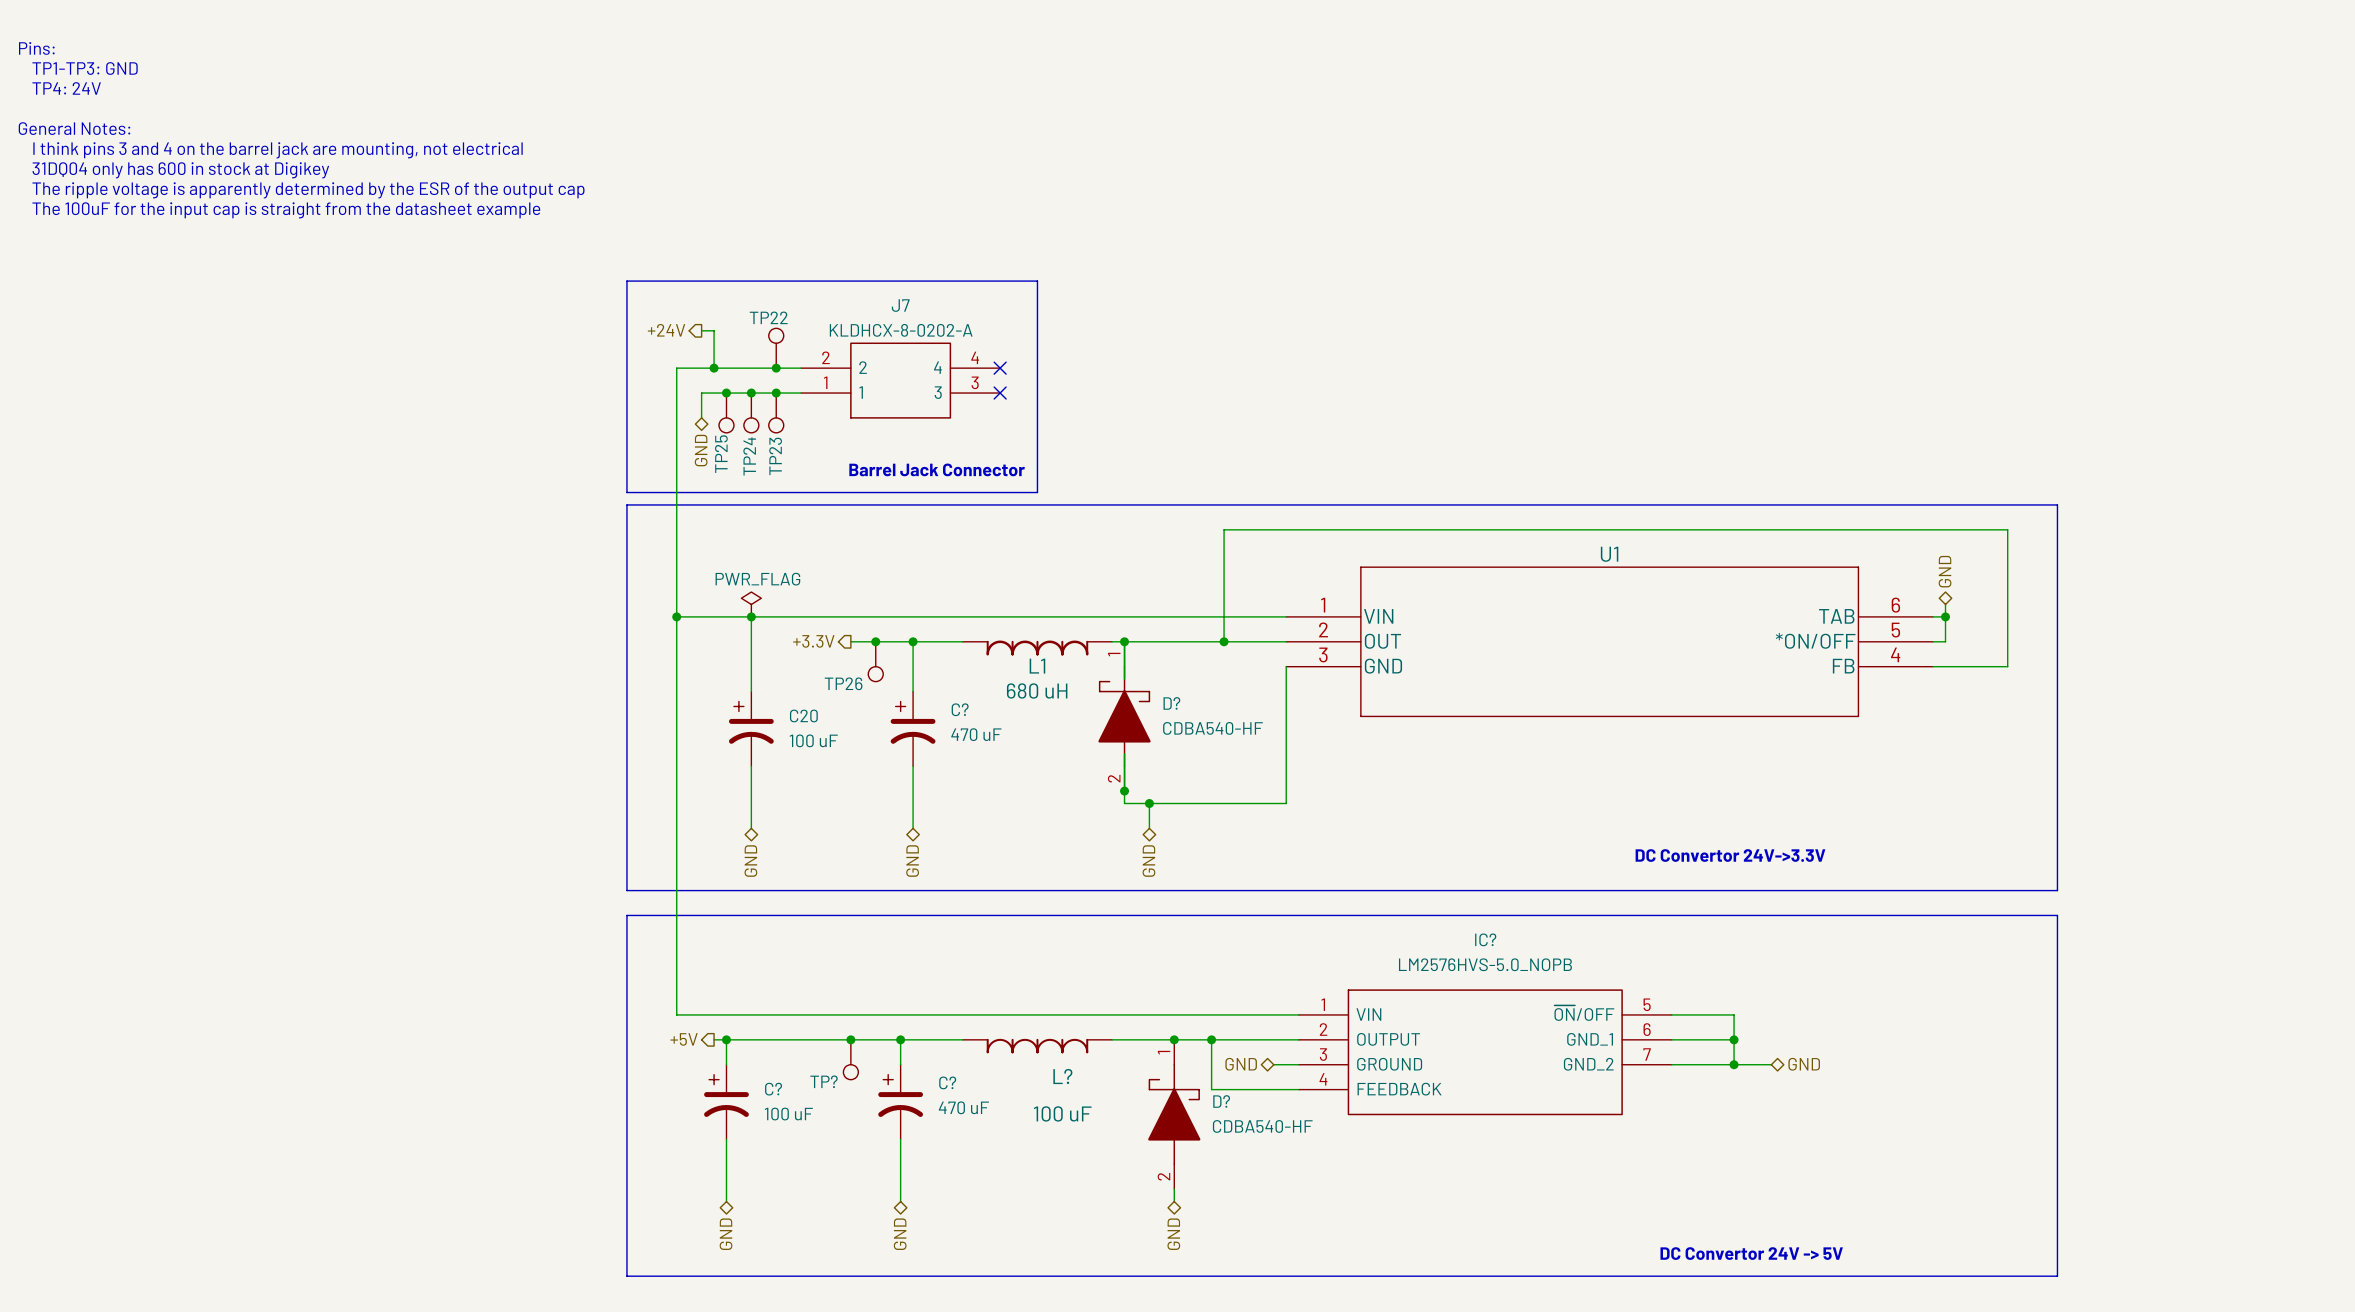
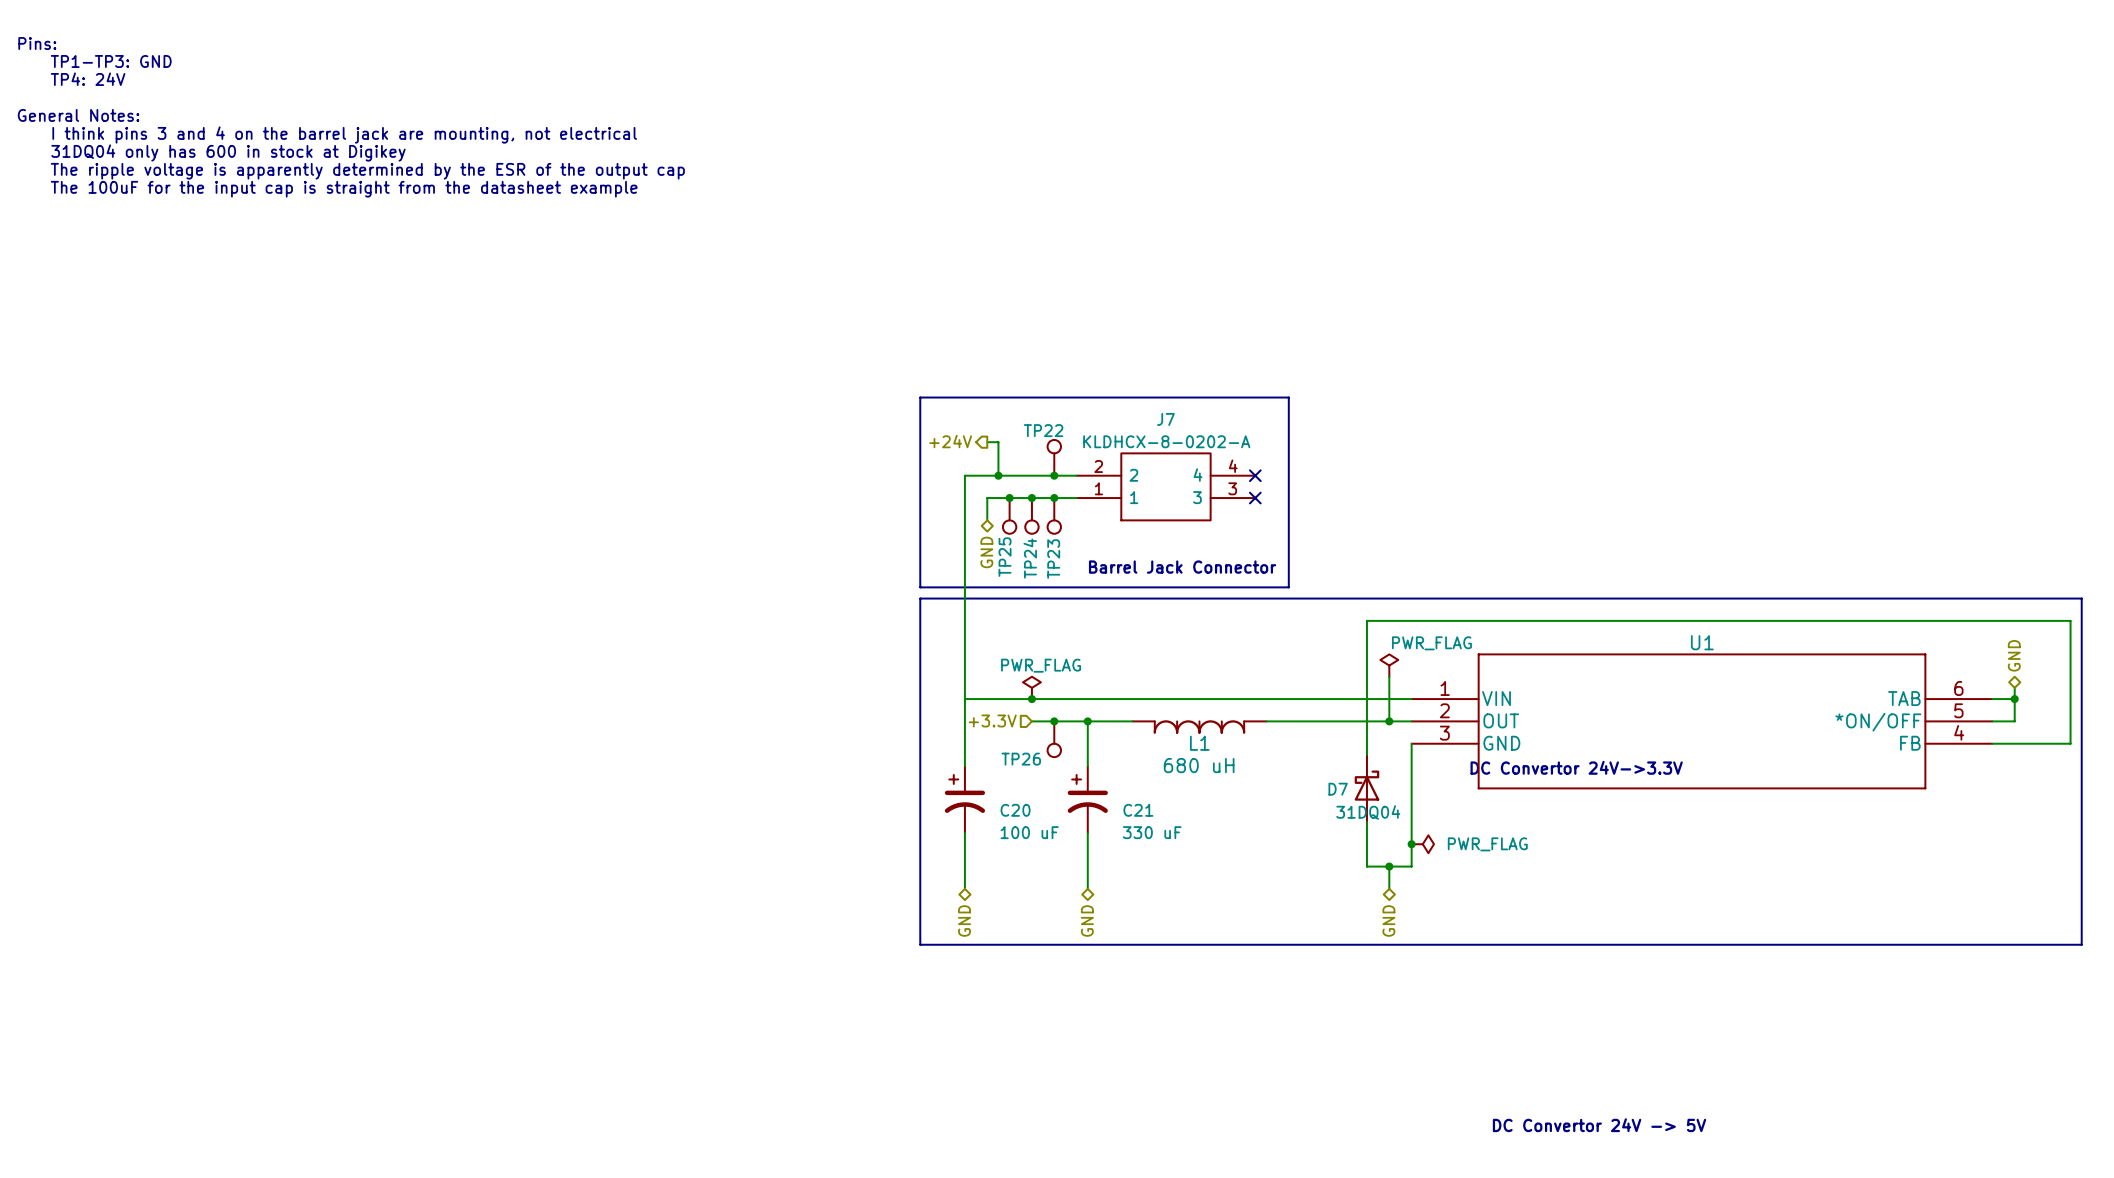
line: (626, 281) (626, 492) (1037, 492) (1037, 281) (626, 281) -> none
hierarchical label: +24V (666, 330) -> none
wire: (701, 330) (714, 330) (714, 368) -> none
TP22 position: (776, 348) -> (1054, 457)
junction: (714, 368) -> none
junction: (776, 368) -> none
wire: (801, 368) (676, 368) (676, 1014) (1298, 1014) -> none
no-connect mark: (1000, 368) -> none
J7 position: (900, 380) -> (1165, 486)
junction: (726, 393) -> none
junction: (751, 393) -> none
junction: (776, 393) -> none
wire: (801, 393) (701, 393) (701, 417) -> none
no-connect mark: (1000, 393) -> none
TP25 position: (726, 412) -> (1009, 515)
TP24 position: (751, 412) -> (1031, 515)
TP23 position: (776, 412) -> (1054, 515)
line: none -> (920, 397) (920, 587) (1288, 587) (1288, 397) (920, 397)
hierarchical label: GND (701, 450) -> none
text: Barrel Jack Connector (937, 469) -> none
hierarchical label: none -> +24V (950, 441)
wire: none -> (987, 442) (998, 442) (998, 475)
line: (626, 504) (626, 890) (2057, 890) (2057, 504) (626, 504) -> none
junction: none -> (998, 475)
junction: none -> (1054, 475)
wire: none -> (1076, 475) (964, 475) (964, 766)
no-connect mark: none -> (1255, 475)
junction: none -> (1009, 498)
junction: none -> (1031, 498)
junction: none -> (1054, 498)
wire: none -> (1076, 498) (987, 498) (987, 520)
no-connect mark: none -> (1255, 498)
hierarchical label: GND (1945, 571) -> none
power symbol: PWR_FLAG (751, 604) -> none
wire: (1945, 604) (1945, 641) (1933, 641) -> none
hierarchical label: none -> GND (986, 552)
wire: (676, 616) (1286, 616) -> none
junction: (676, 616) -> none
wire: (751, 616) (751, 691) -> none
junction: (751, 616) -> none
wire: (1933, 616) (1945, 616) -> none
junction: (1945, 616) -> none
text: none -> Barrel Jack Connector (1182, 567)
hierarchical label: +3.3V (813, 641) -> none
wire: (850, 641) (962, 641) -> none
junction: (875, 641) -> none
wire: (913, 641) (913, 691) -> none
junction: (913, 641) -> none
wire: (1112, 641) (1286, 641) -> none
wire: (1124, 641) (1124, 679) -> none
junction: (1124, 641) -> none
wire: (1224, 641) (1224, 529) (2007, 529) (2007, 666) (1933, 666) -> none
junction: (1224, 641) -> none
U1 position: (1609, 641) -> (1702, 721)
L1 position: (1037, 648) -> (1199, 726)
TP26 position: (875, 661) -> (1054, 739)
line: none -> (920, 598) (920, 944) (2081, 944) (2081, 598) (920, 598)
wire: (1286, 666) (1286, 803) (1261, 803) -> none
C20 name position: C20 (803, 715) -> C20 (1015, 810)
D?: CDBA540-HF (1124, 716) -> none
C20 position: (751, 728) -> (964, 799)
C?: 470 uF (913, 728) -> none
hierarchical label: none -> GND (2014, 655)
C20 value position: 100 uF (813, 740) -> 100 uF (1029, 832)
power symbol: none -> PWR_FLAG (1389, 665)
wire: (1124, 753) (1124, 803) (1149, 803) (1149, 828) -> none
wire: none -> (1389, 676) (1389, 721)
wire: (751, 766) (751, 828) -> none
wire: (913, 766) (913, 828) -> (964, 833) (964, 888)
power symbol: none -> PWR_FLAG (1031, 687)
wire: none -> (2014, 687) (2014, 721) (1992, 721)
wire: none -> (964, 699) (1411, 699)
junction: none -> (1031, 699)
wire: none -> (1992, 699) (2014, 699)
junction: none -> (2014, 699)
junction: (1124, 791) -> none
hierarchical label: none -> +3.3V (992, 720)
junction: (1149, 803) -> none
junction: none -> (1054, 721)
wire: none -> (1087, 721) (1087, 766)
junction: none -> (1087, 721)
wire: none -> (1266, 721) (1411, 721)
junction: none -> (1389, 721)
wire: none -> (1411, 743) (1411, 866) (1366, 866) (1366, 821)
wire: none -> (1992, 743) (2070, 743) (2070, 620) (1366, 620) (1366, 754)
hierarchical label: GND (750, 861) -> none
hierarchical label: GND (912, 861) -> none
hierarchical label: GND (1148, 861) -> none
D7: none -> 31DQ04 (1366, 788)
C21: none -> 330 uF (1087, 799)
line: (626, 915) (626, 1276) (2057, 1276) (2057, 915) (626, 915) -> none
wire: none -> (1087, 833) (1087, 888)
junction: none -> (1411, 844)
power symbol: none -> PWR_FLAG (1422, 844)
wire: none -> (1389, 866) (1389, 888)
junction: none -> (1389, 866)
wire: (1671, 1014) (1734, 1014) (1734, 1064) -> none
hierarchical label: none -> GND (964, 920)
hierarchical label: none -> GND (1388, 920)
hierarchical label: +5V (684, 1039) -> none
wire: (714, 1039) (962, 1039) -> none
wire: (726, 1039) (726, 1064) -> none
junction: (726, 1039) -> none
junction: (850, 1039) -> none
wire: (900, 1039) (900, 1064) -> none
junction: (900, 1039) -> none
wire: (1112, 1039) (1298, 1039) -> none
junction: (1174, 1039) -> none
wire: (1211, 1039) (1211, 1089) (1298, 1089) -> none
junction: (1211, 1039) -> none
wire: (1671, 1039) (1734, 1039) -> none
junction: (1734, 1039) -> none
L?: 100 uF (1037, 1046) -> none
IC?: LM2576HVS-5.0_NOPB (1485, 1052) -> none
TP?: (850, 1059) -> none
hierarchical label rotation: 0° (1241, 1064) -> 90° counterclockwise (1087, 920)
wire: (1273, 1064) (1298, 1064) -> none
wire: (1671, 1064) (1771, 1064) -> none
junction: (1734, 1064) -> none
hierarchical label: GND (1804, 1064) -> none
C?: 100 uF (726, 1102) -> none
C?: 470 uF (900, 1102) -> none
D?: CDBA540-HF (1174, 1114) -> none
wire: (726, 1139) (726, 1201) -> none
wire: (900, 1139) (900, 1201) -> none
wire: (1174, 1189) (1174, 1201) -> none
hierarchical label: GND (726, 1234) -> none
hierarchical label: GND (900, 1234) -> none
hierarchical label: GND (1173, 1234) -> none

